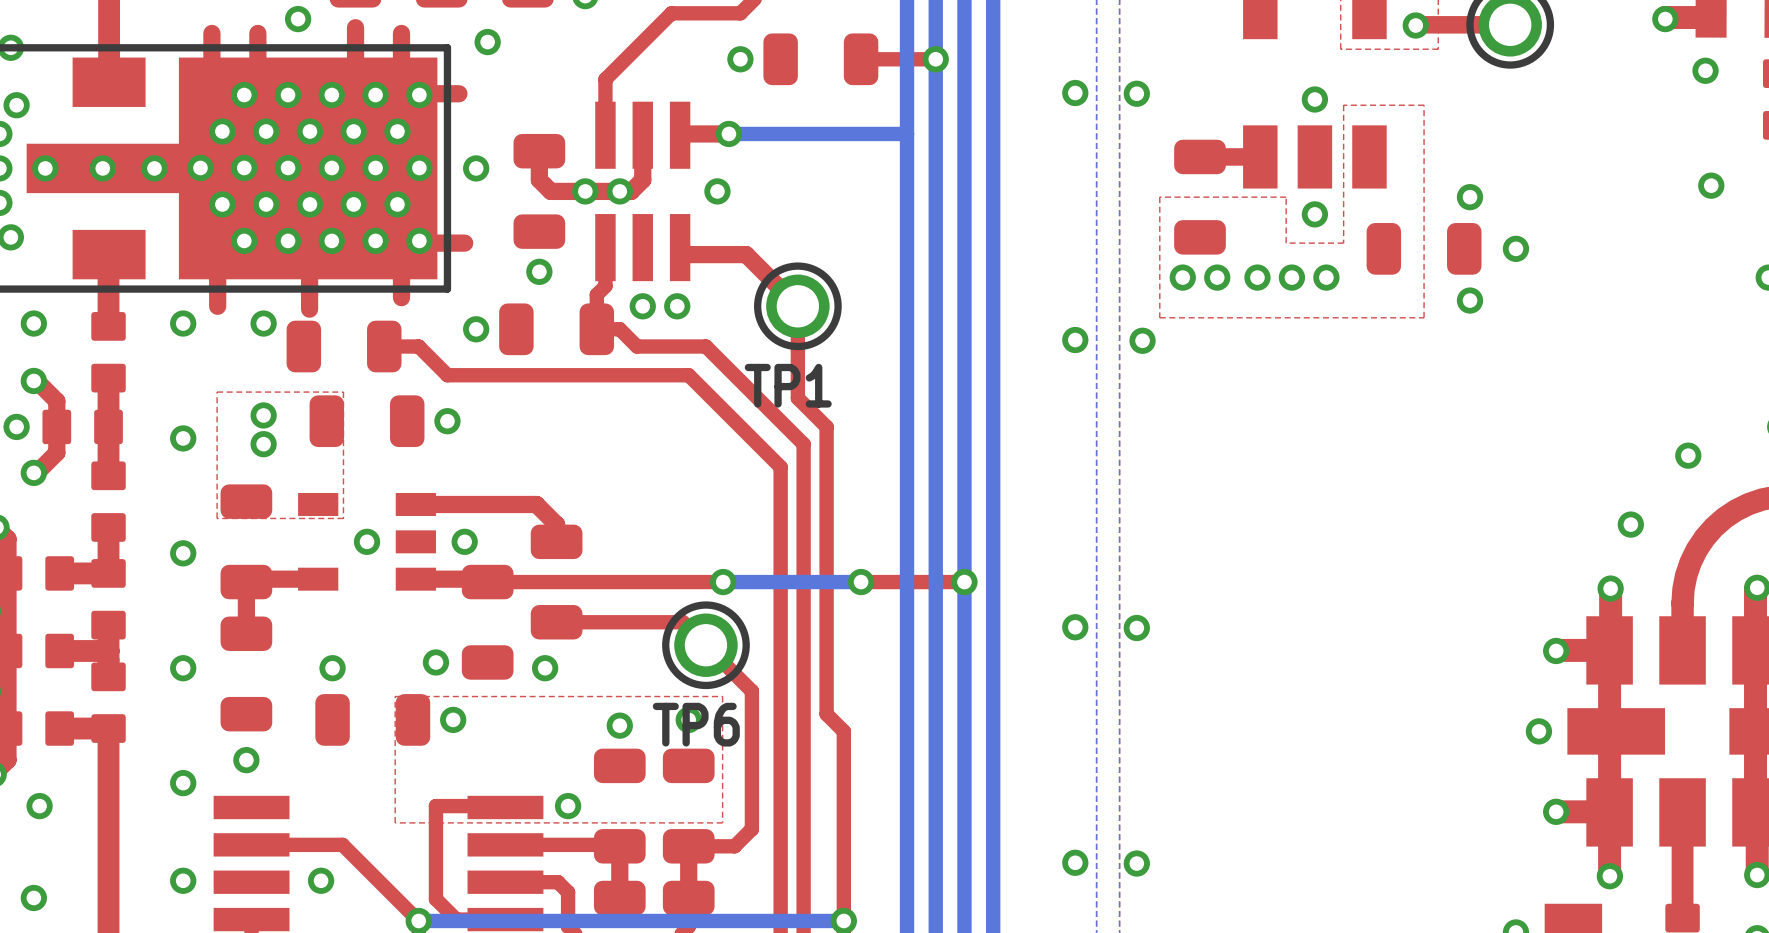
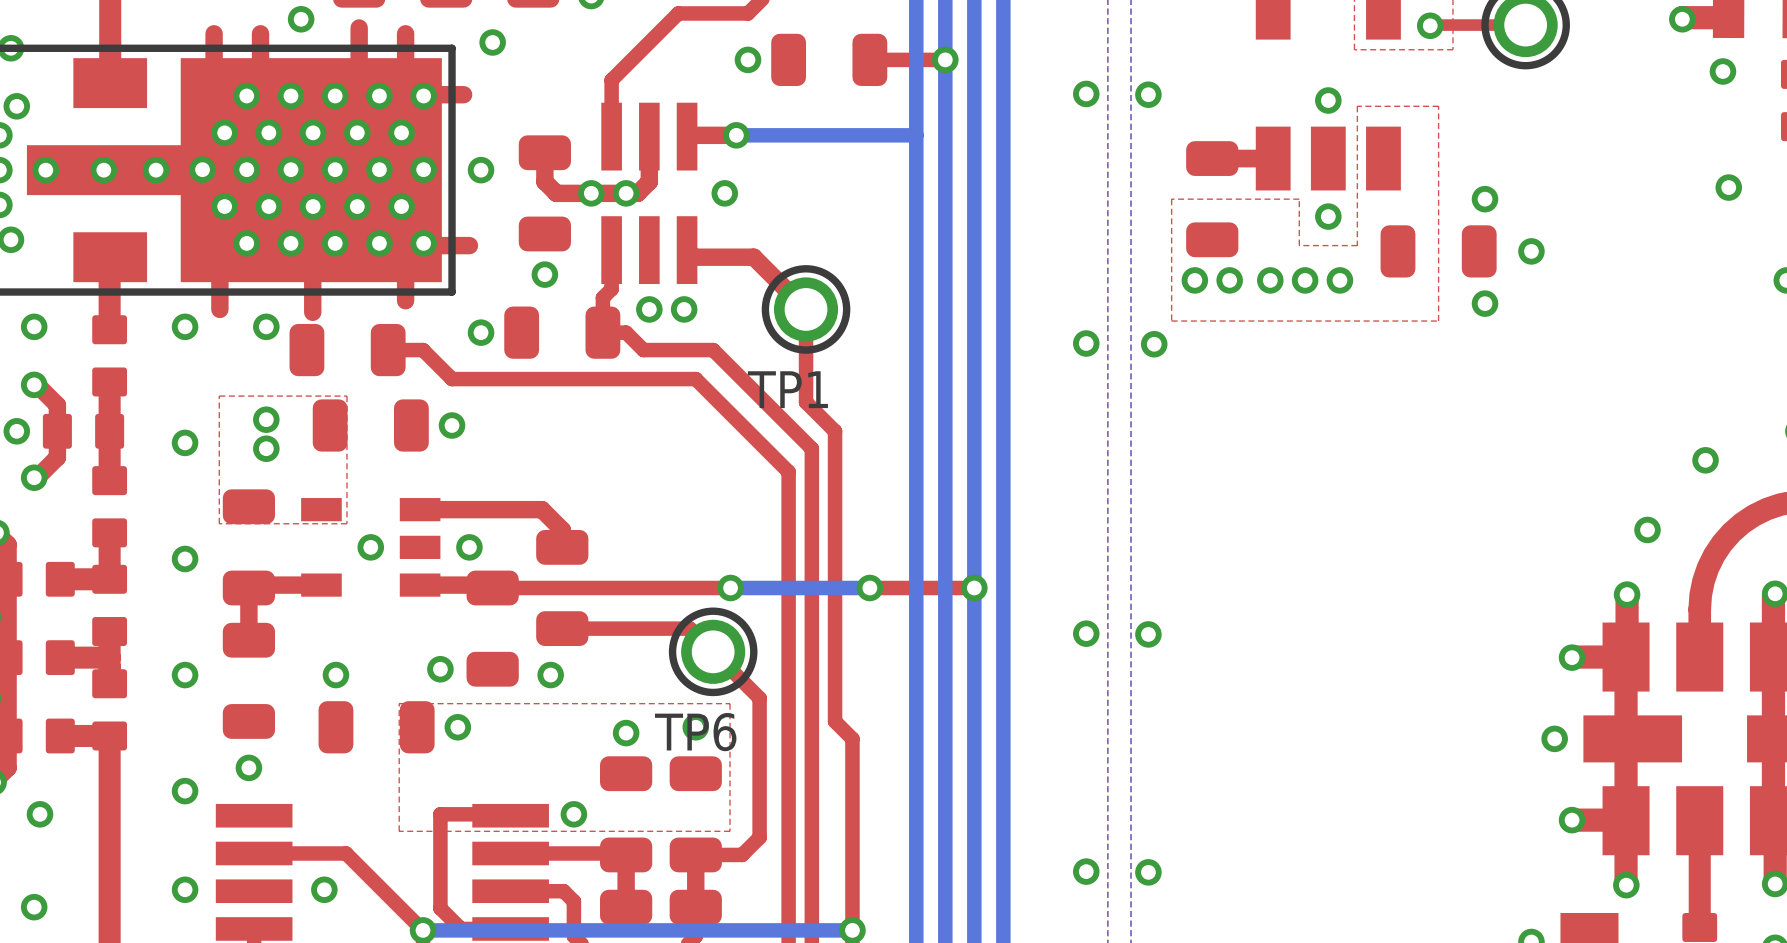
top track width: thick (1510, 24) (1416, 24) -> thin (1525, 25) (1430, 25)

